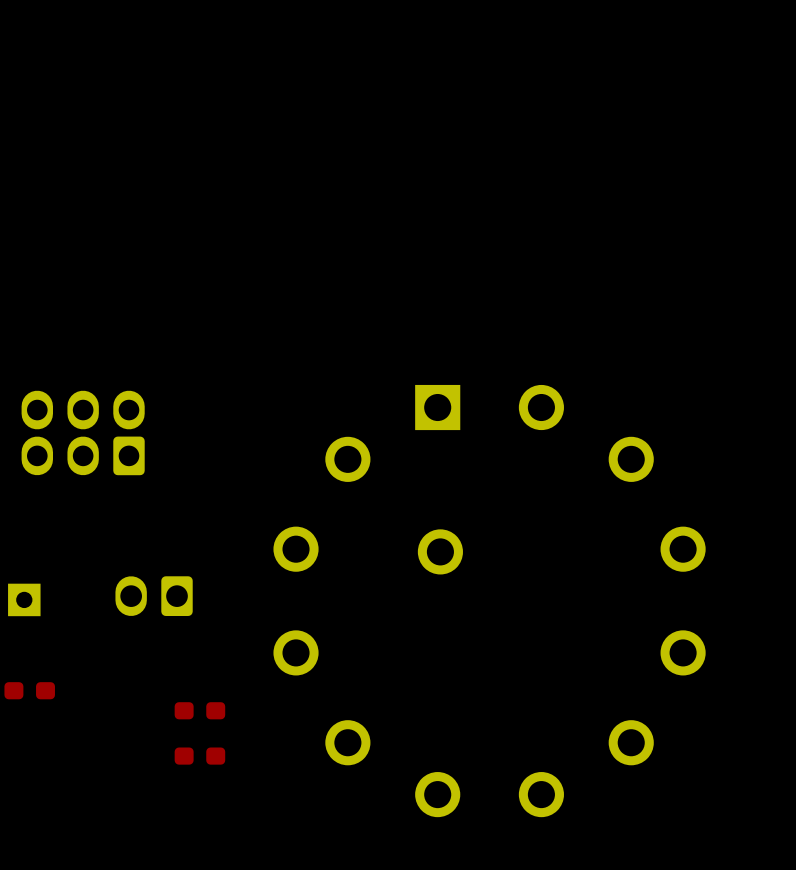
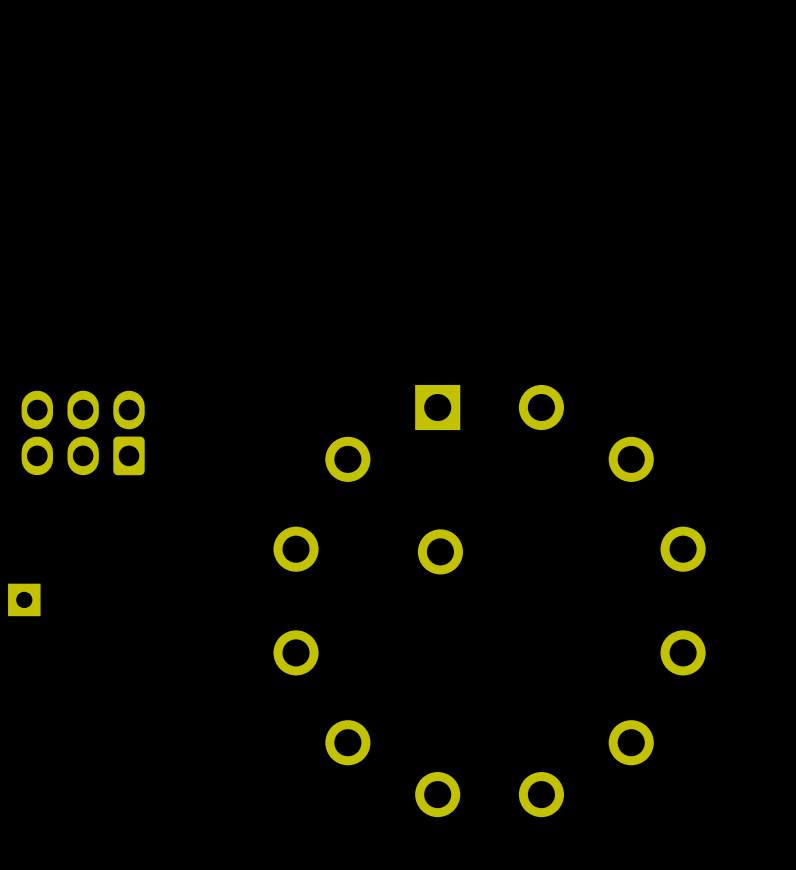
part: (154, 596) -> none
part: (29, 690) -> none
part: (199, 710) -> none
part: (199, 756) -> none

